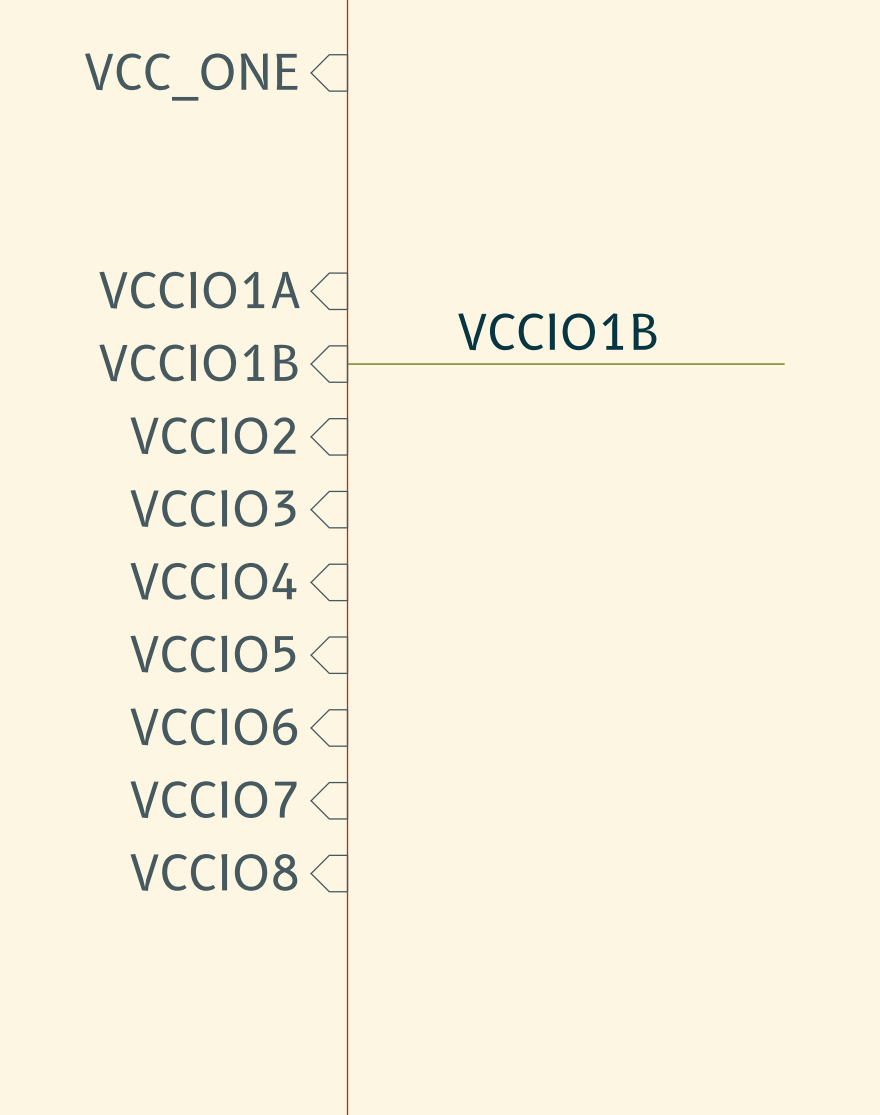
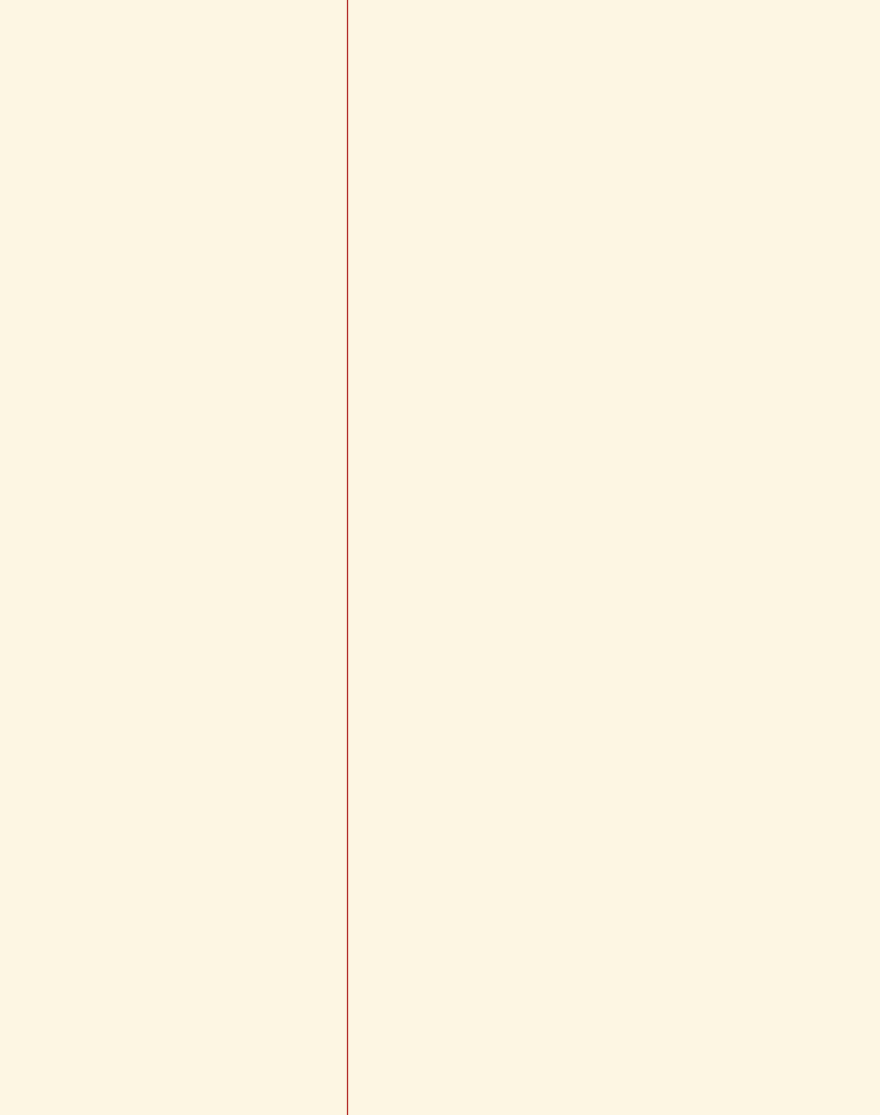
sheet pin: VCC_ONE (191, 77) -> none
sheet pin: VCCIO1A (199, 290) -> none
label: VCCIO1B (557, 331) -> none
sheet pin: VCCIO1B (198, 362) -> none
wire: (347, 364) (784, 364) -> none
sheet pin: VCCIO2 (212, 435) -> none
sheet pin: VCCIO3 (213, 508) -> none
sheet pin: VCCIO4 (213, 581) -> none
sheet pin: VCCIO5 (212, 654) -> none
sheet pin: VCCIO6 (213, 726) -> none
sheet pin: VCCIO7 (213, 799) -> none
sheet pin: VCCIO8 (213, 872) -> none

